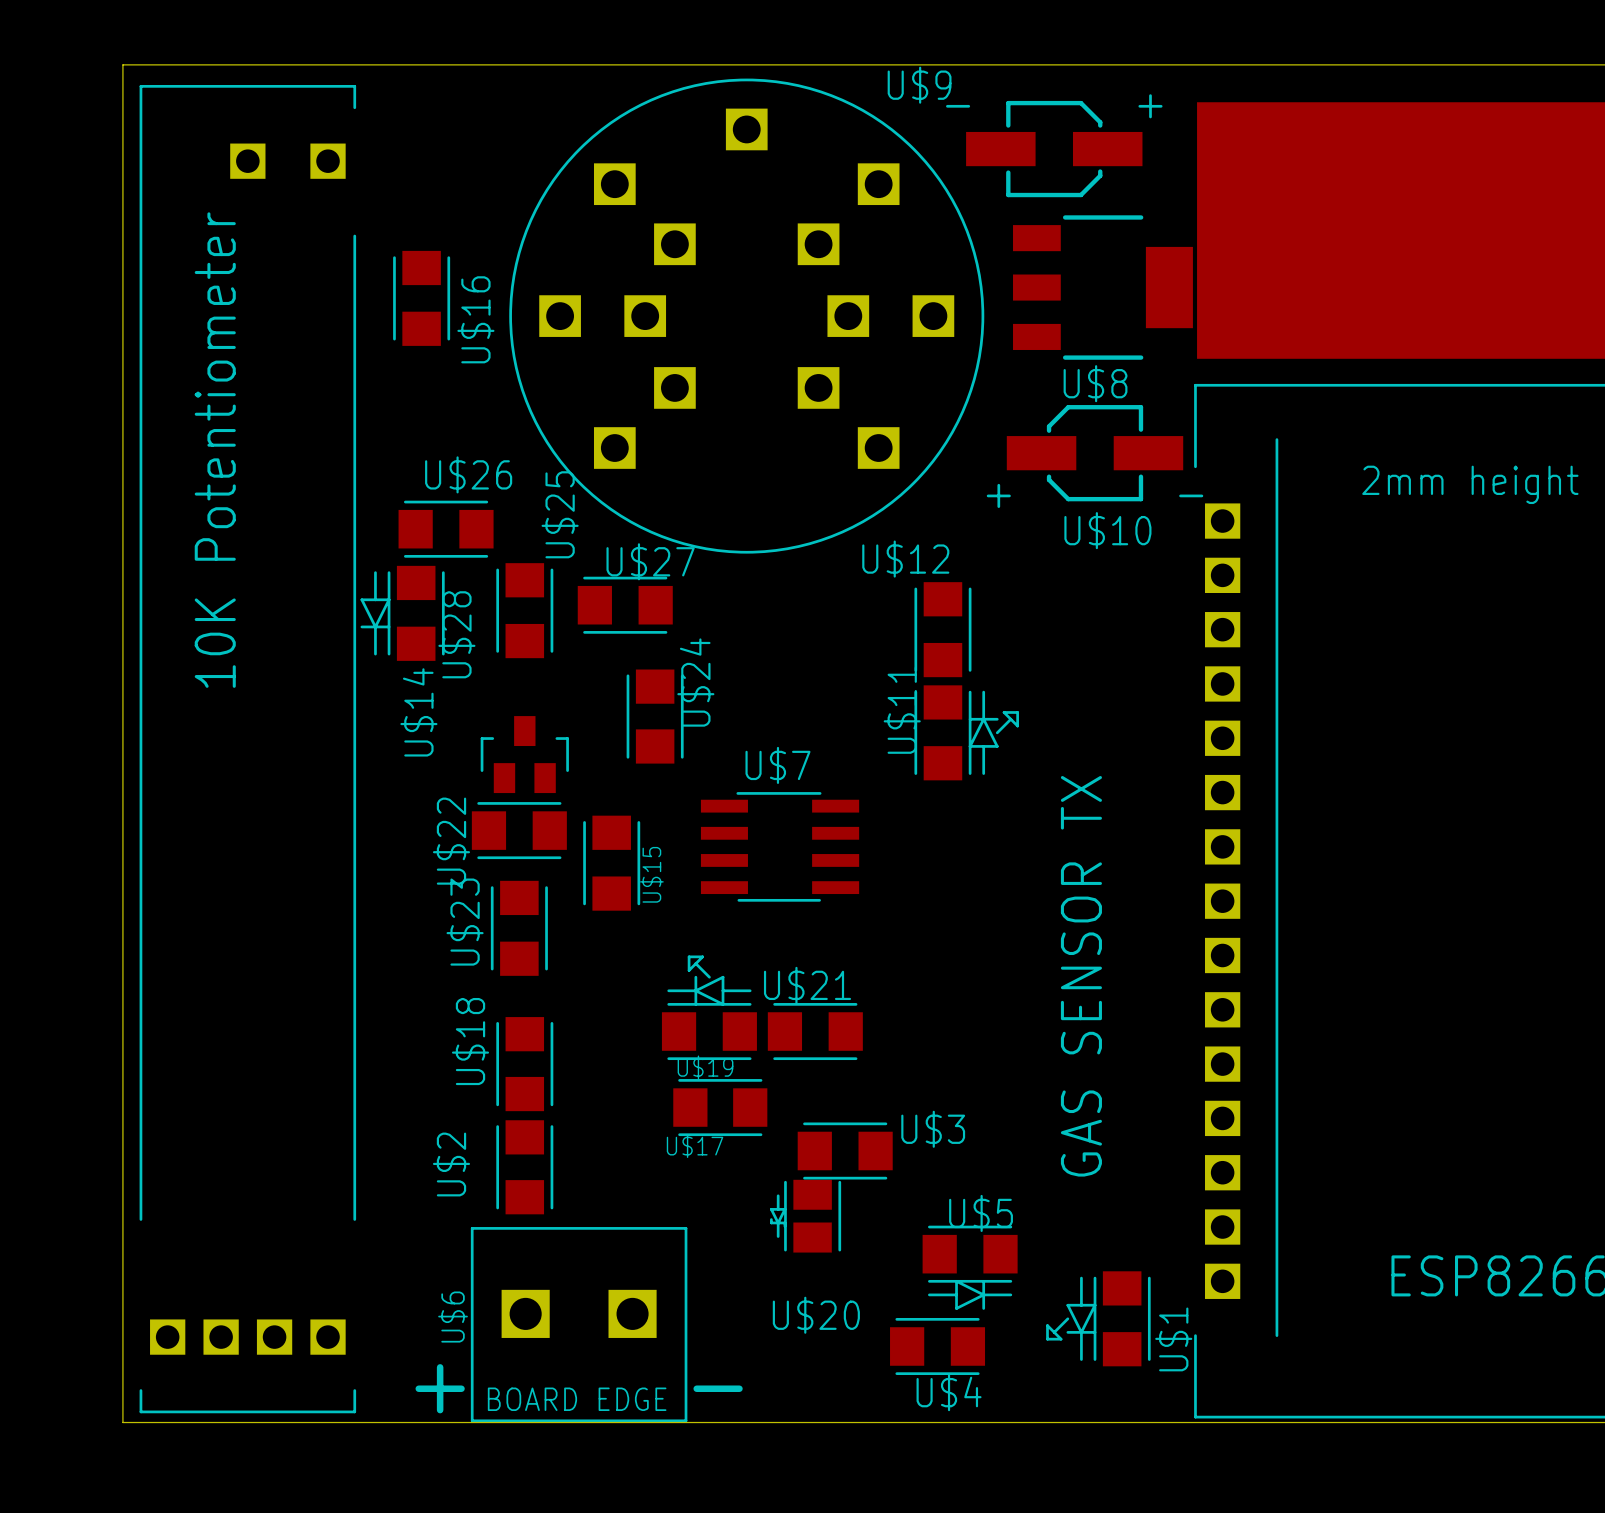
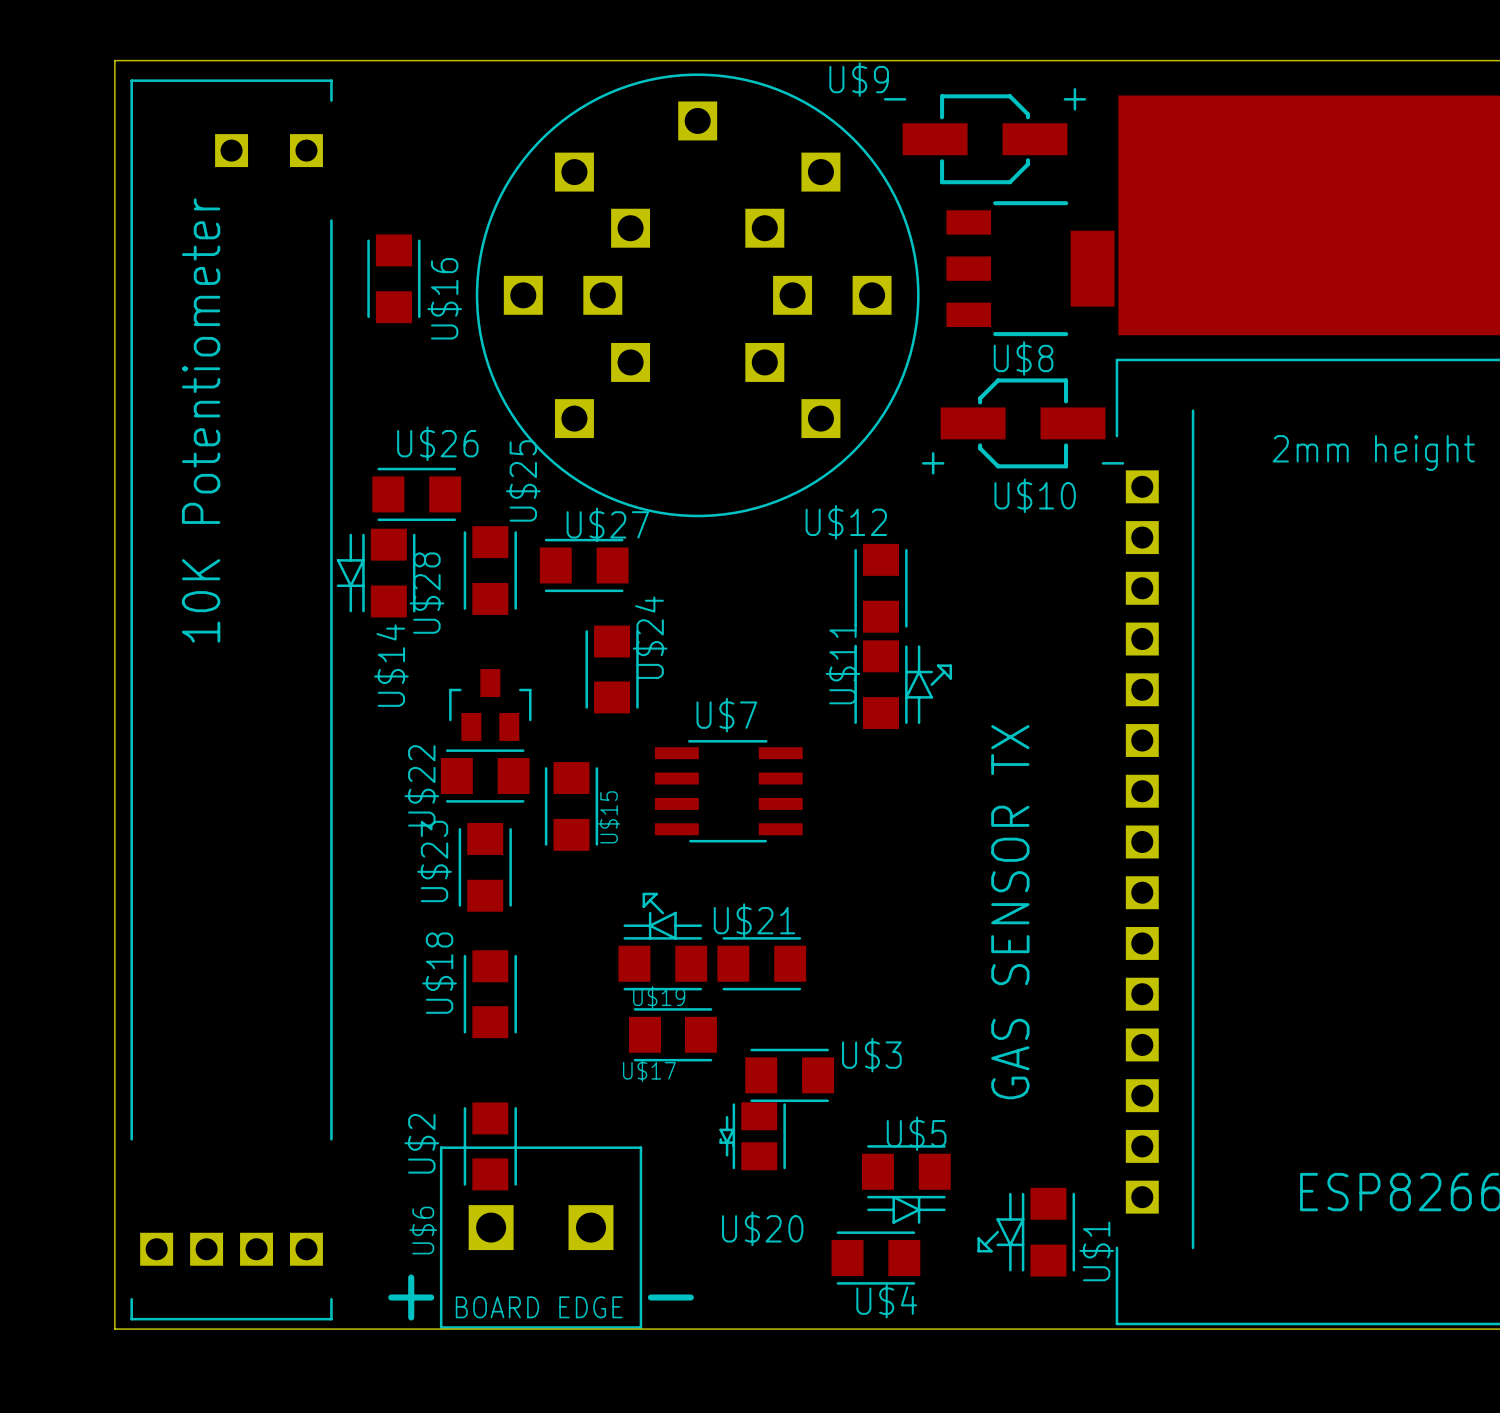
U$2 position: (524, 1167) -> (490, 1146)

